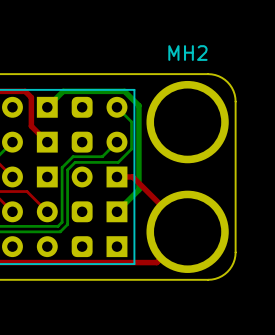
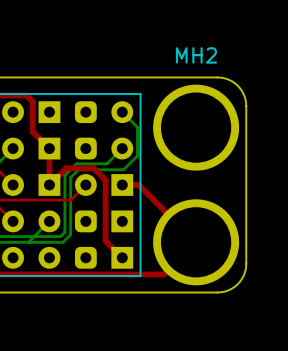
bottom track: (47, 107) (63, 91) (124, 91) (138, 105) (138, 189) (116, 211) -> none
top track: none -> (49, 148) (49, 184) (66, 168) (93, 168) (105, 180) (105, 241) (122, 257)
top track: (27, 191) (47, 211) -> (28, 200) (70, 200) (85, 184)
bottom track: none -> (49, 221) (28, 242)

